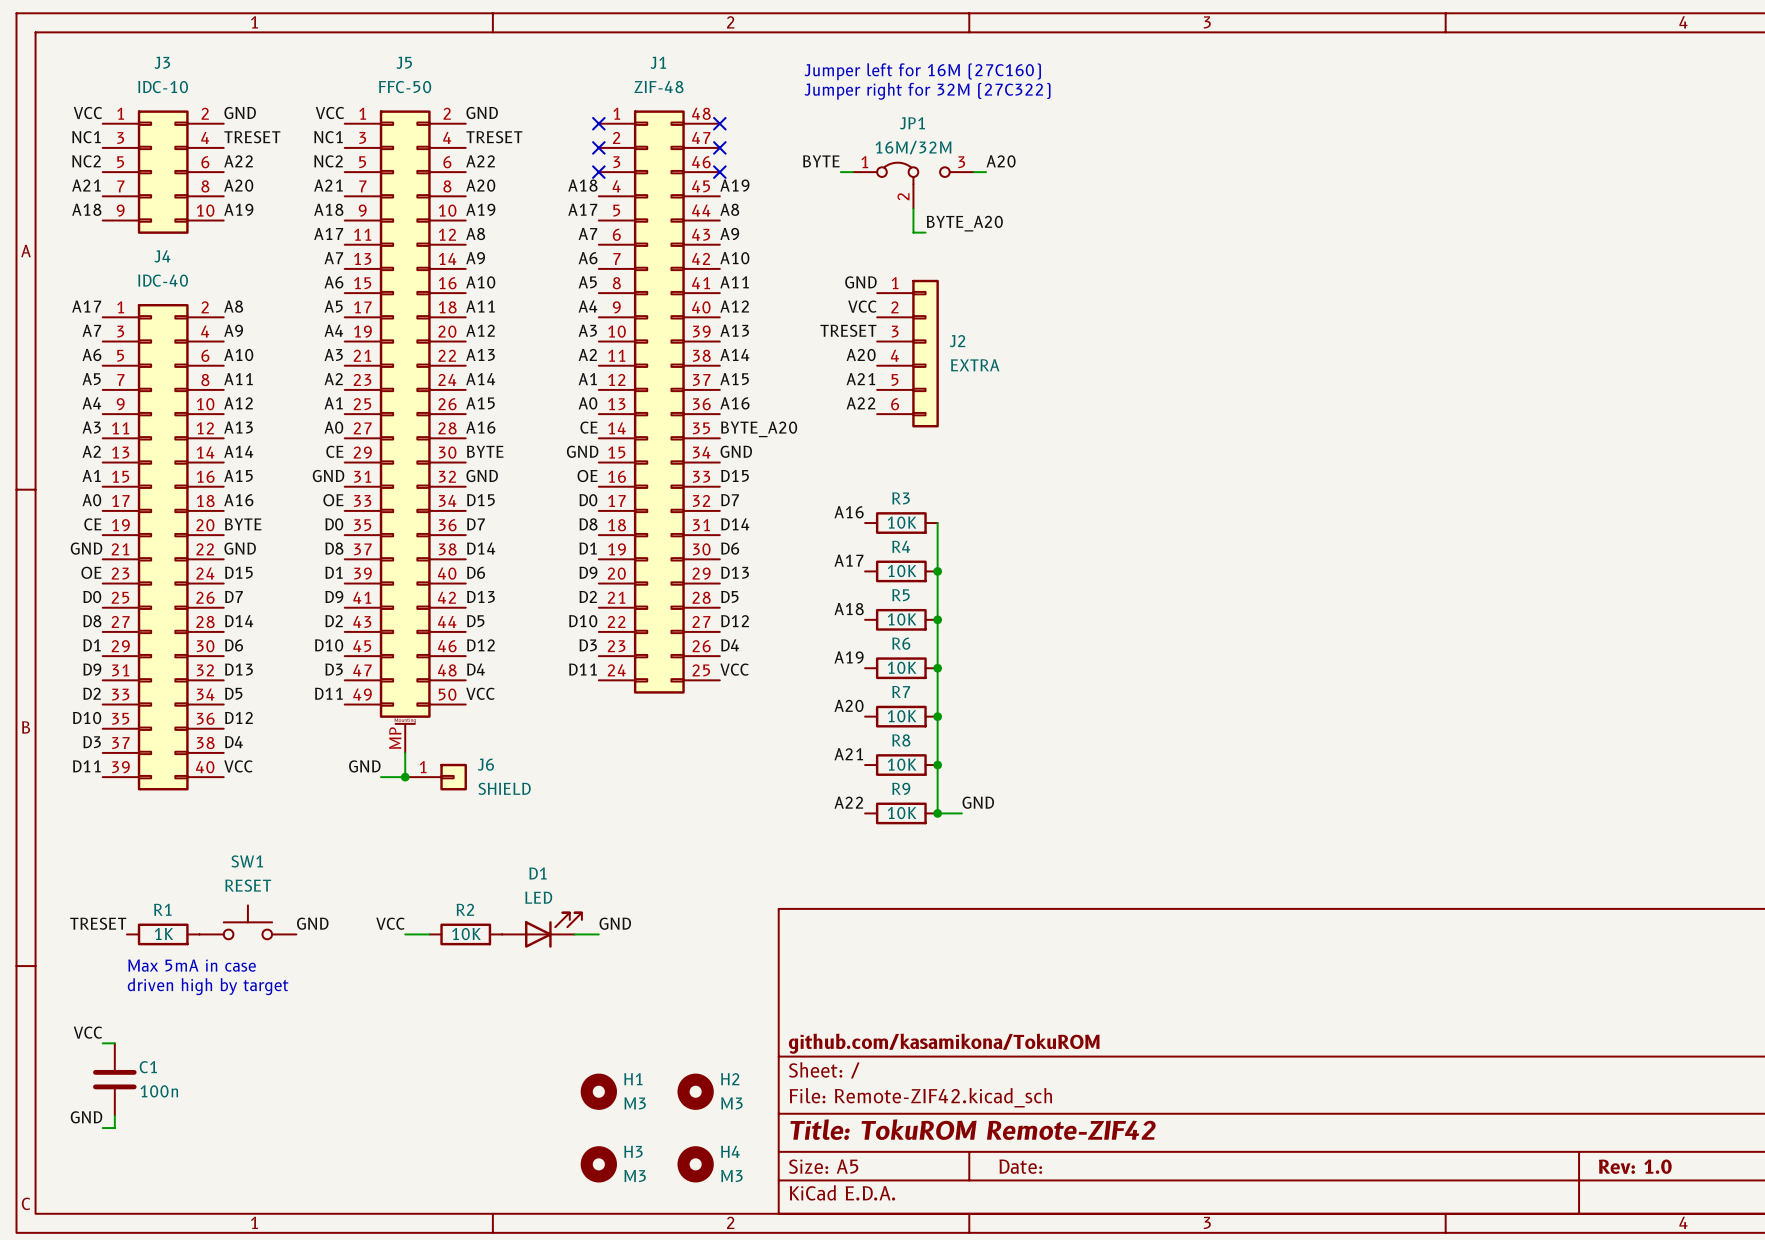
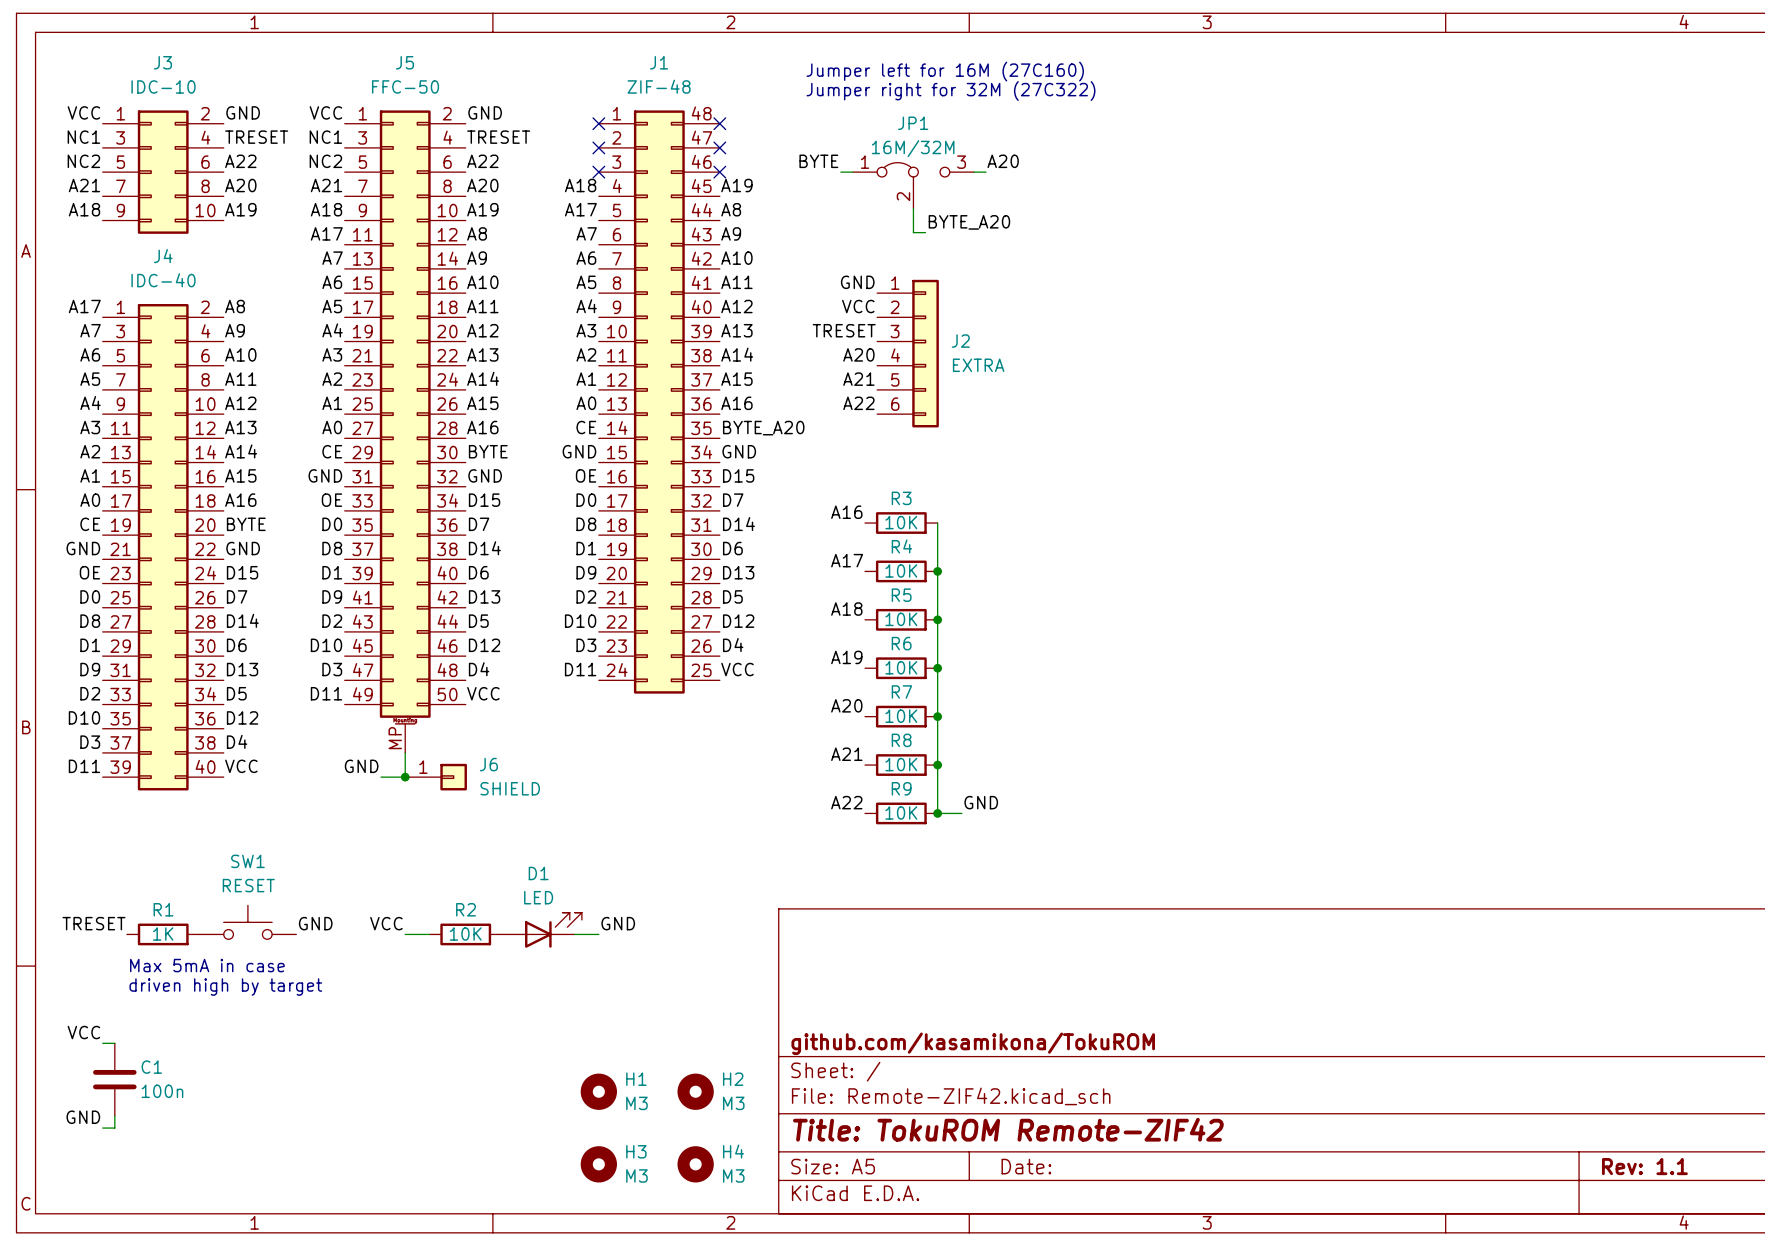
title block: Rev: 1.0 (1635, 1166) -> Rev: 1.1 (1644, 1166)

